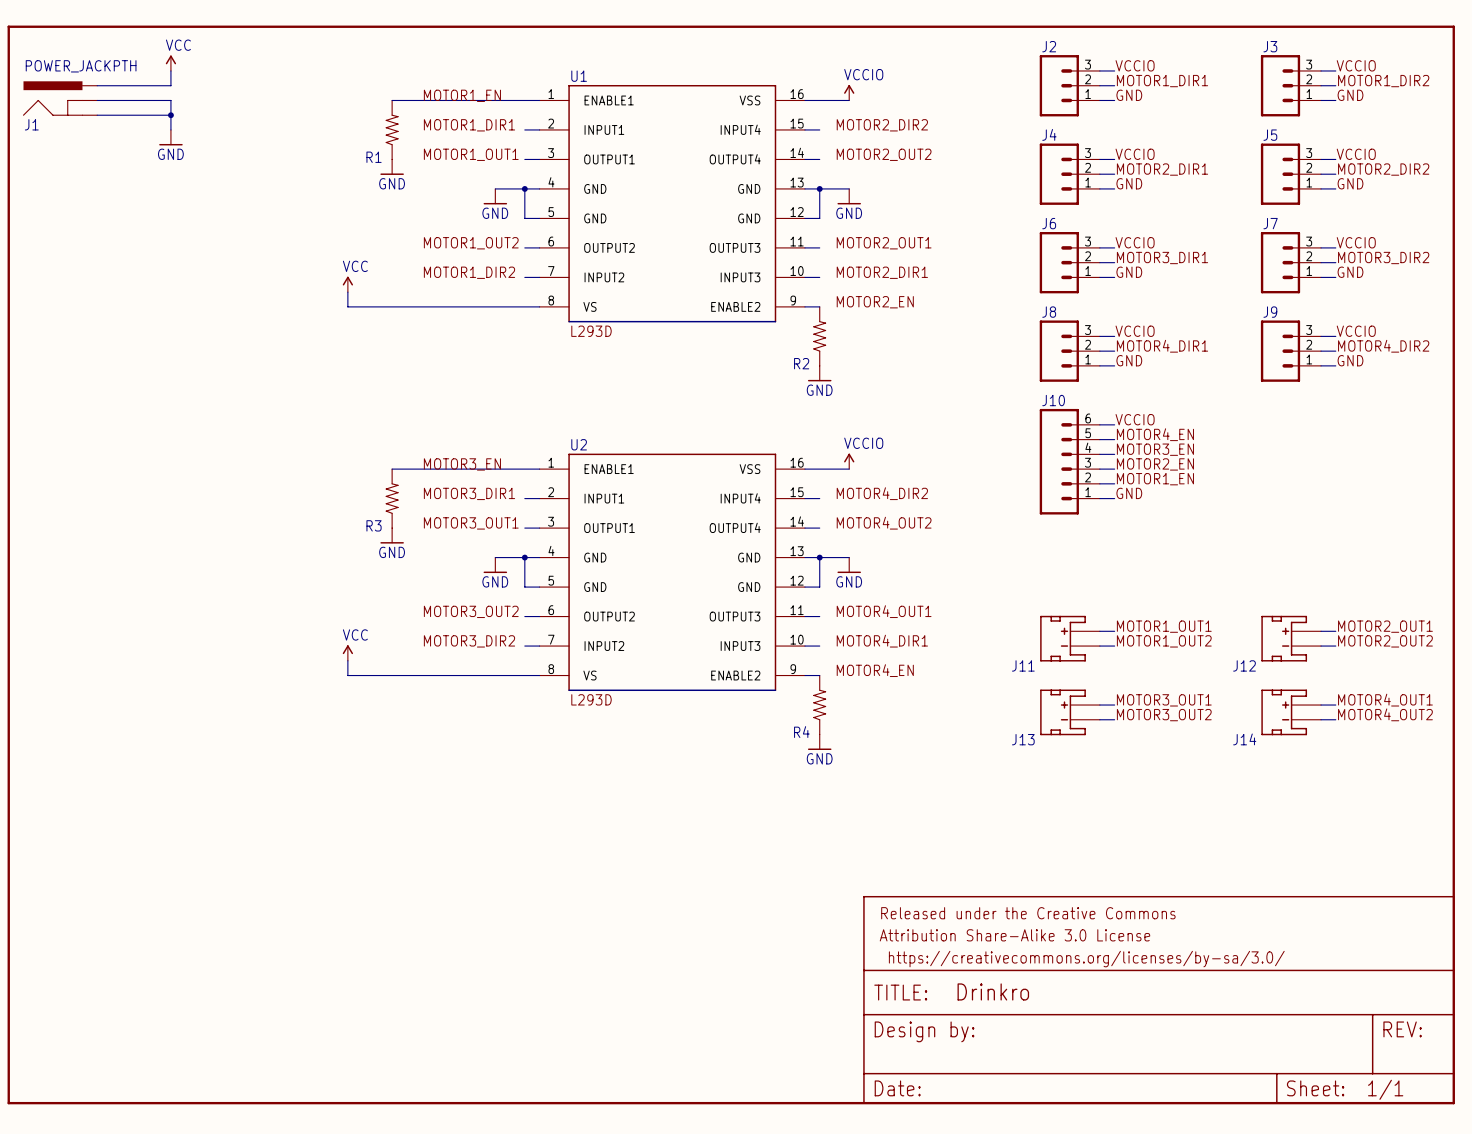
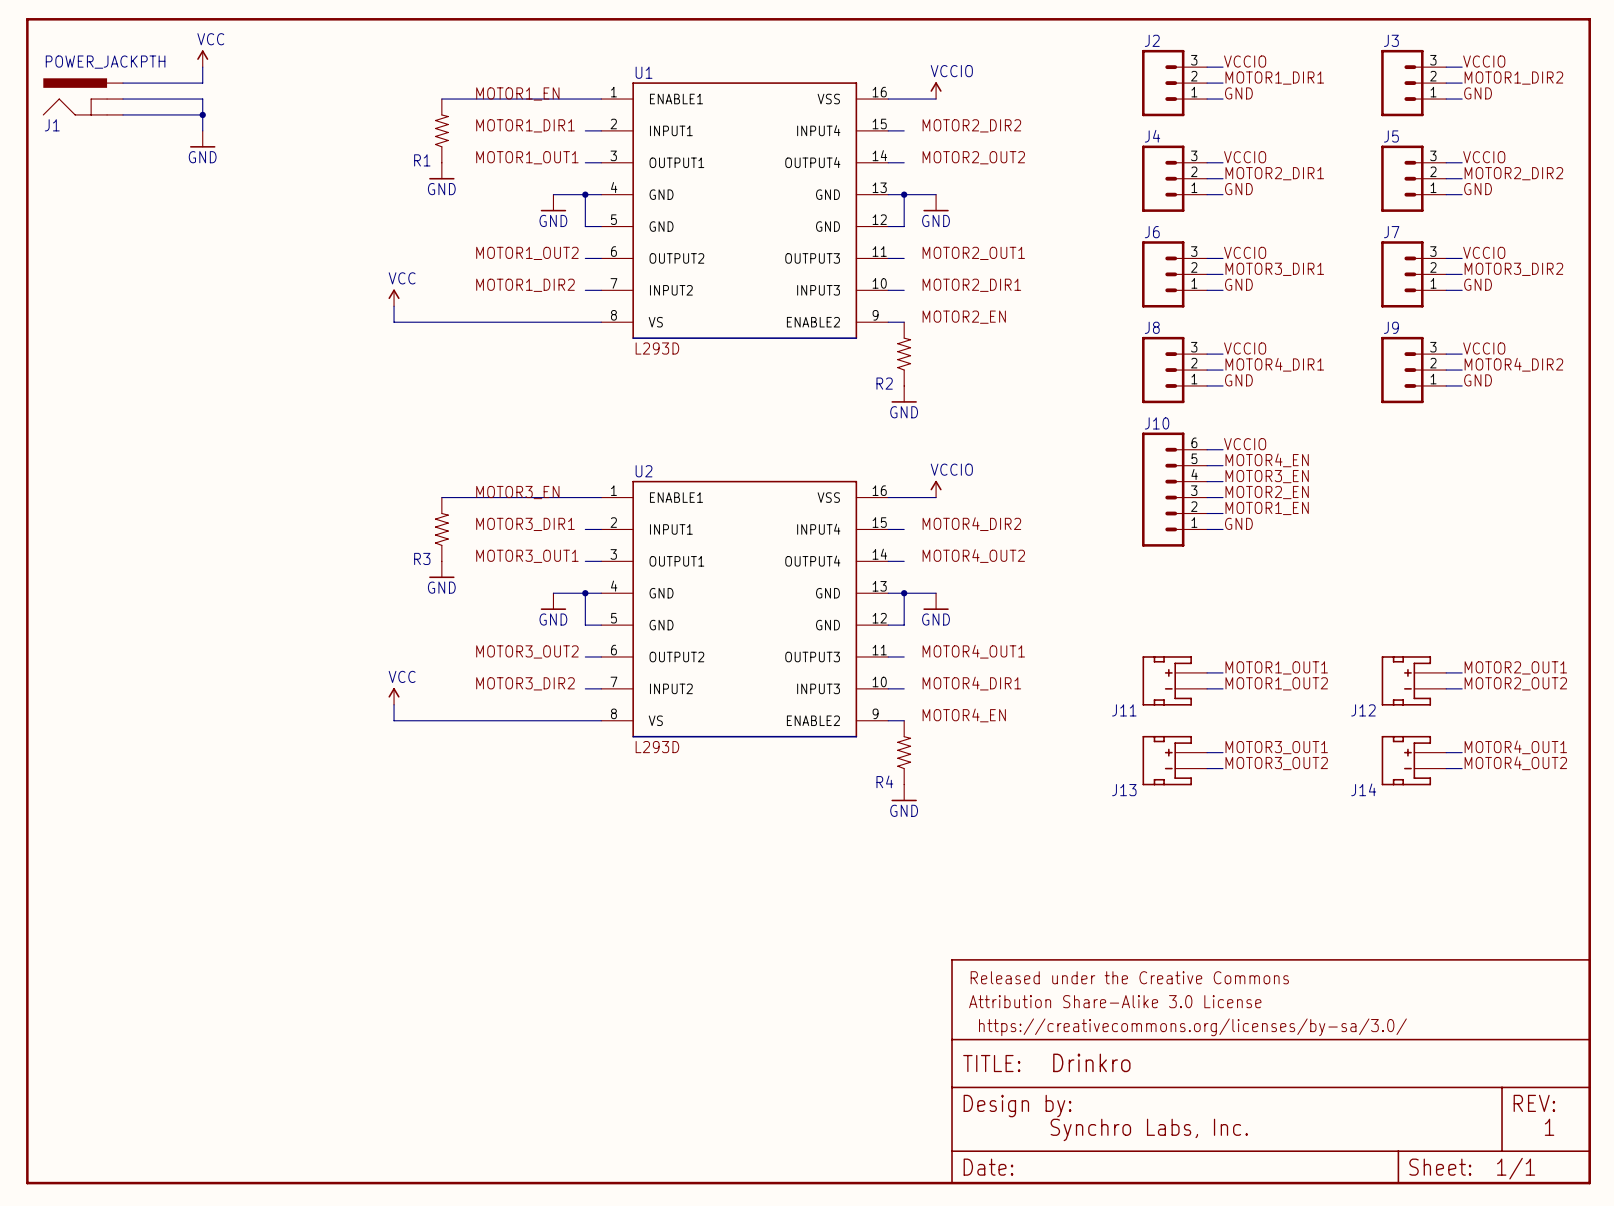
text: none -> 1 (1549, 1127)
text: none -> Synchro Labs, Inc. (1149, 1129)

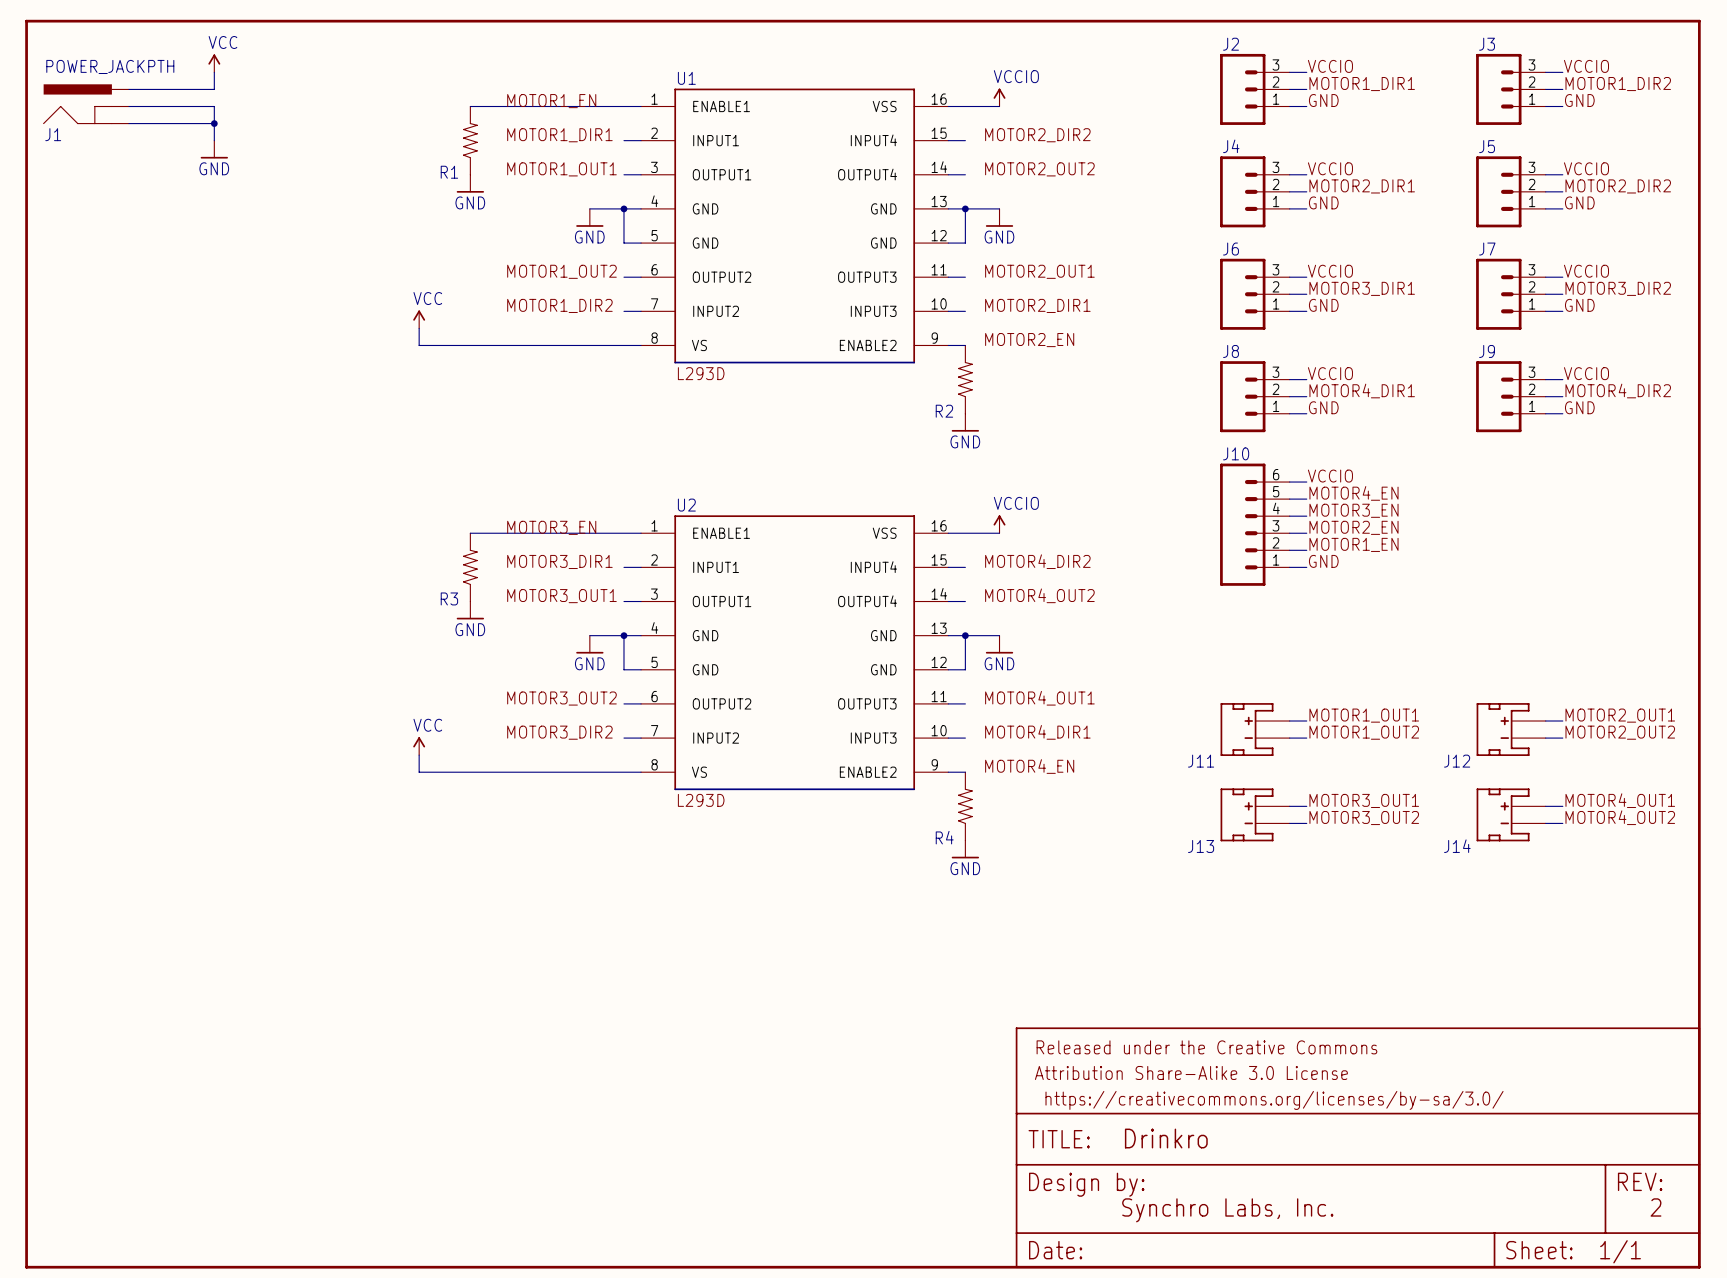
text: 1 (1549, 1127) -> 2 (1656, 1207)

